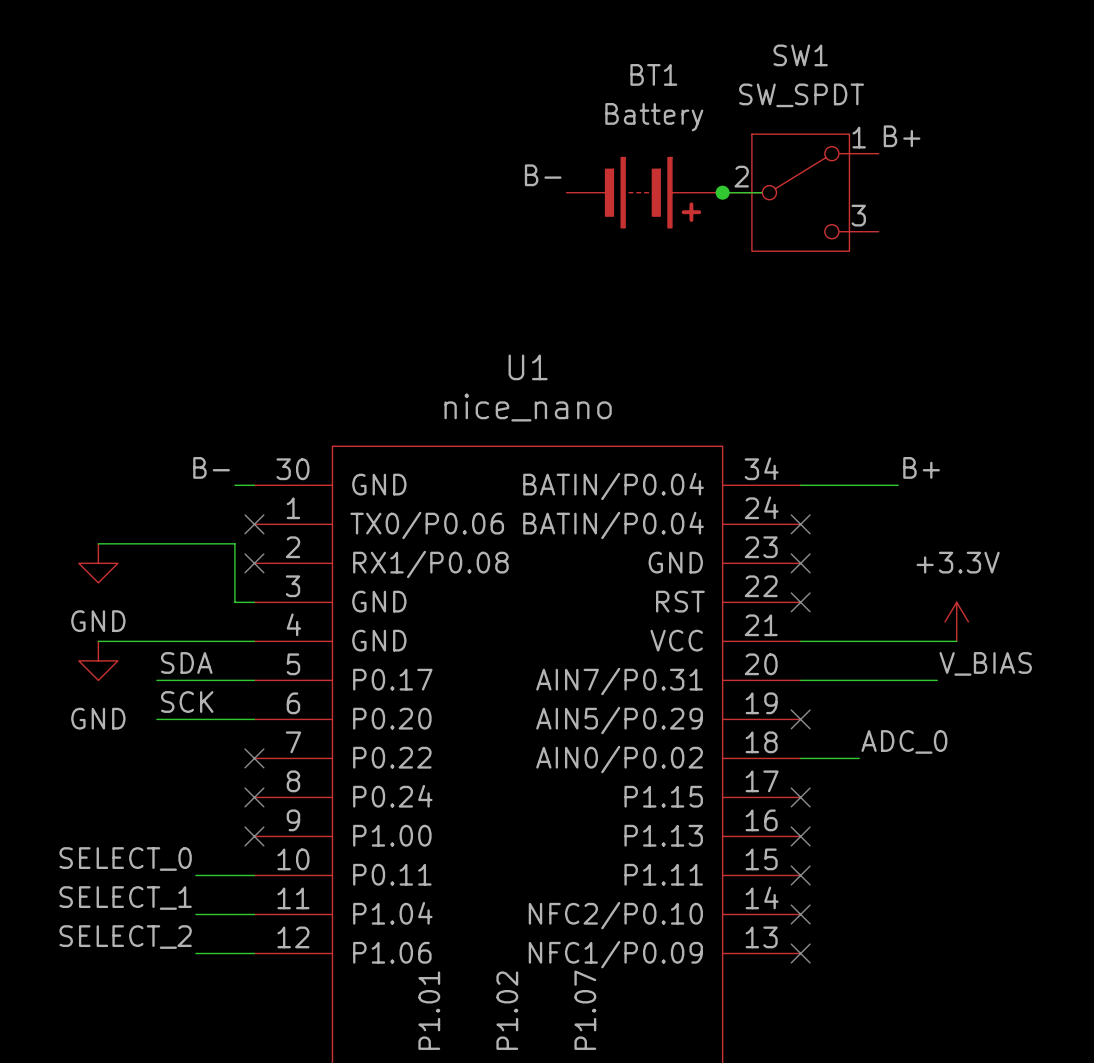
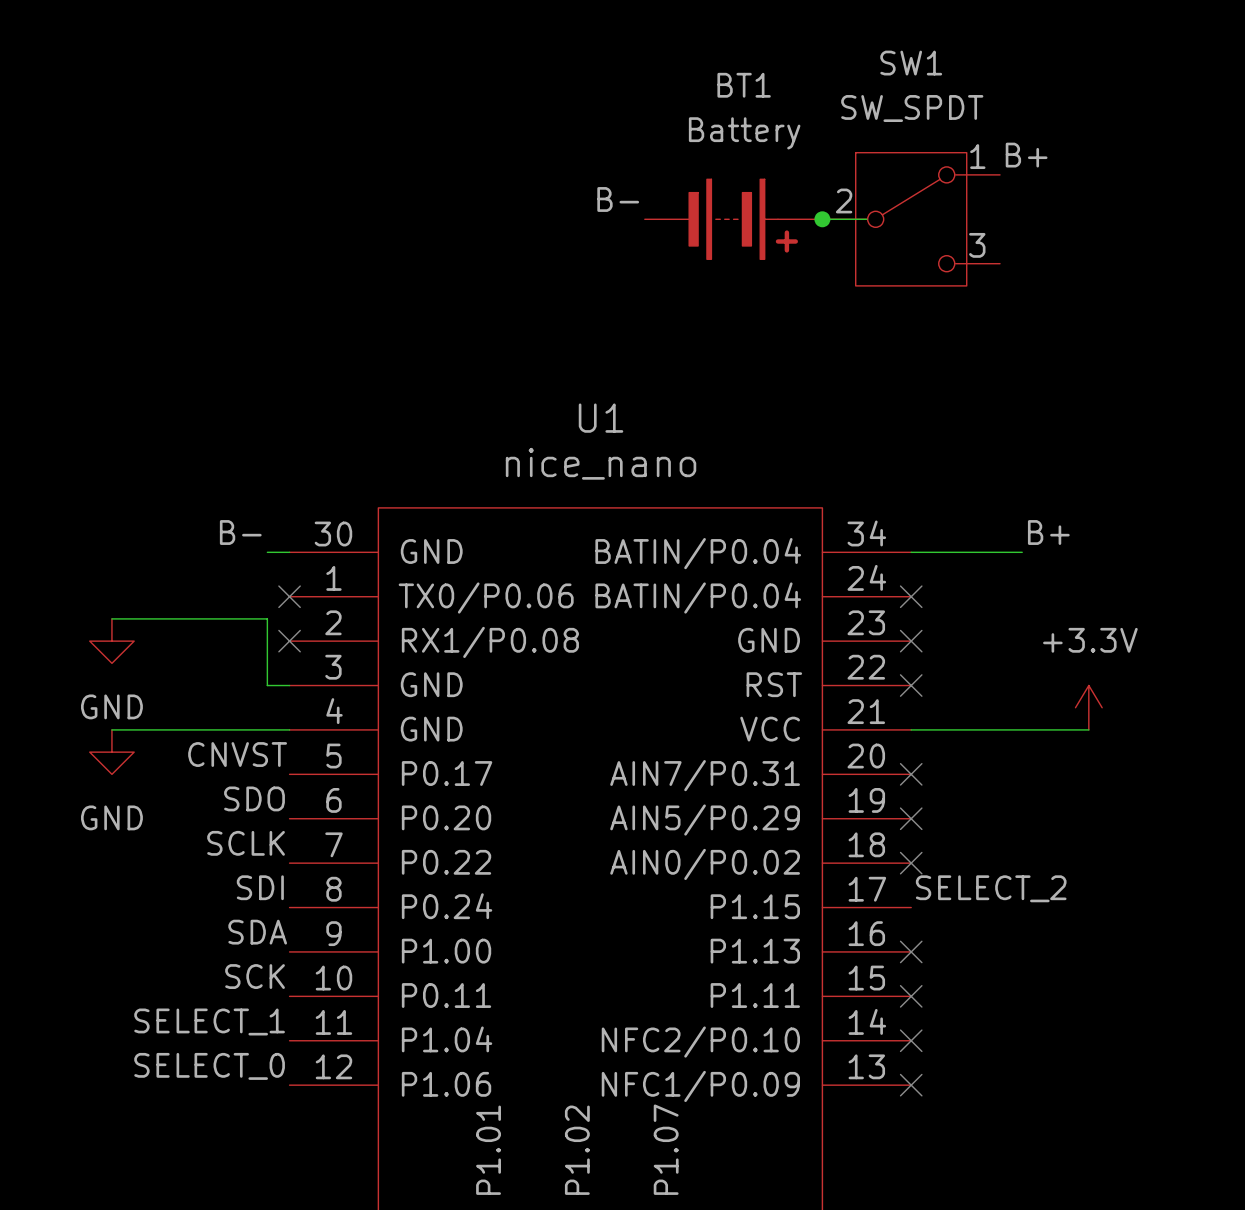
label position: SDA (186, 662) -> SDA (257, 932)
label: none -> CNVST (237, 754)
label: V_BIAS (985, 663) -> none
wire: (156, 680) (254, 680) -> none
wire: (800, 680) (937, 680) -> none
no-connect mark: none -> (911, 774)
label position: SCK (187, 702) -> SCK (255, 976)
label: none -> SDO (254, 798)
wire: (156, 719) (254, 719) -> none
label: none -> SCLK (246, 843)
label: ADC_0 (904, 741) -> none
no-connect mark: (254, 758) -> none
wire: (800, 758) (859, 758) -> none
label: none -> SDI (260, 887)
label: none -> SELECT_2 (991, 888)
no-connect mark: (254, 797) -> none
no-connect mark position: (800, 797) -> (911, 863)
no-connect mark: (254, 836) -> none
label position: SELECT_0 (125, 859) -> SELECT_0 (209, 1066)
wire: (195, 875) (254, 875) -> none
label position: SELECT_1 (125, 898) -> SELECT_1 (209, 1022)
wire: (195, 914) (254, 914) -> none
label: SELECT_2 (125, 937) -> none
wire: (195, 953) (254, 953) -> none

